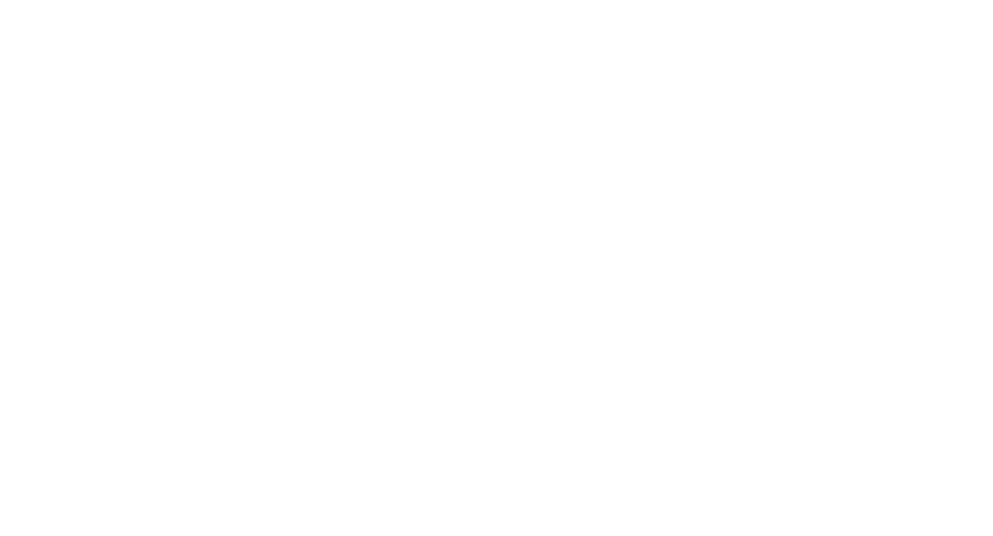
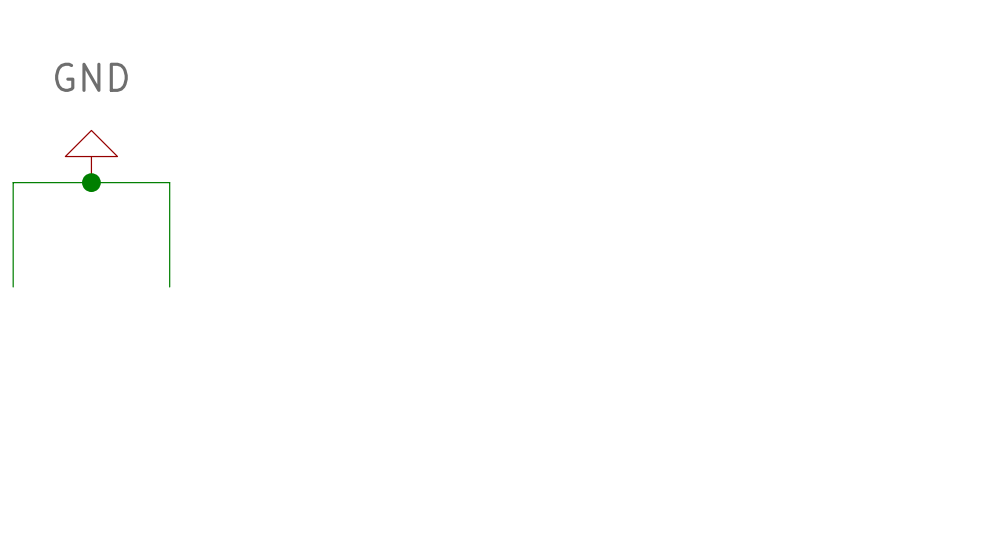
power symbol: none -> GND (91, 156)
junction: none -> (91, 182)
wire: none -> (13, 286) (13, 182) (169, 182) (169, 286)

